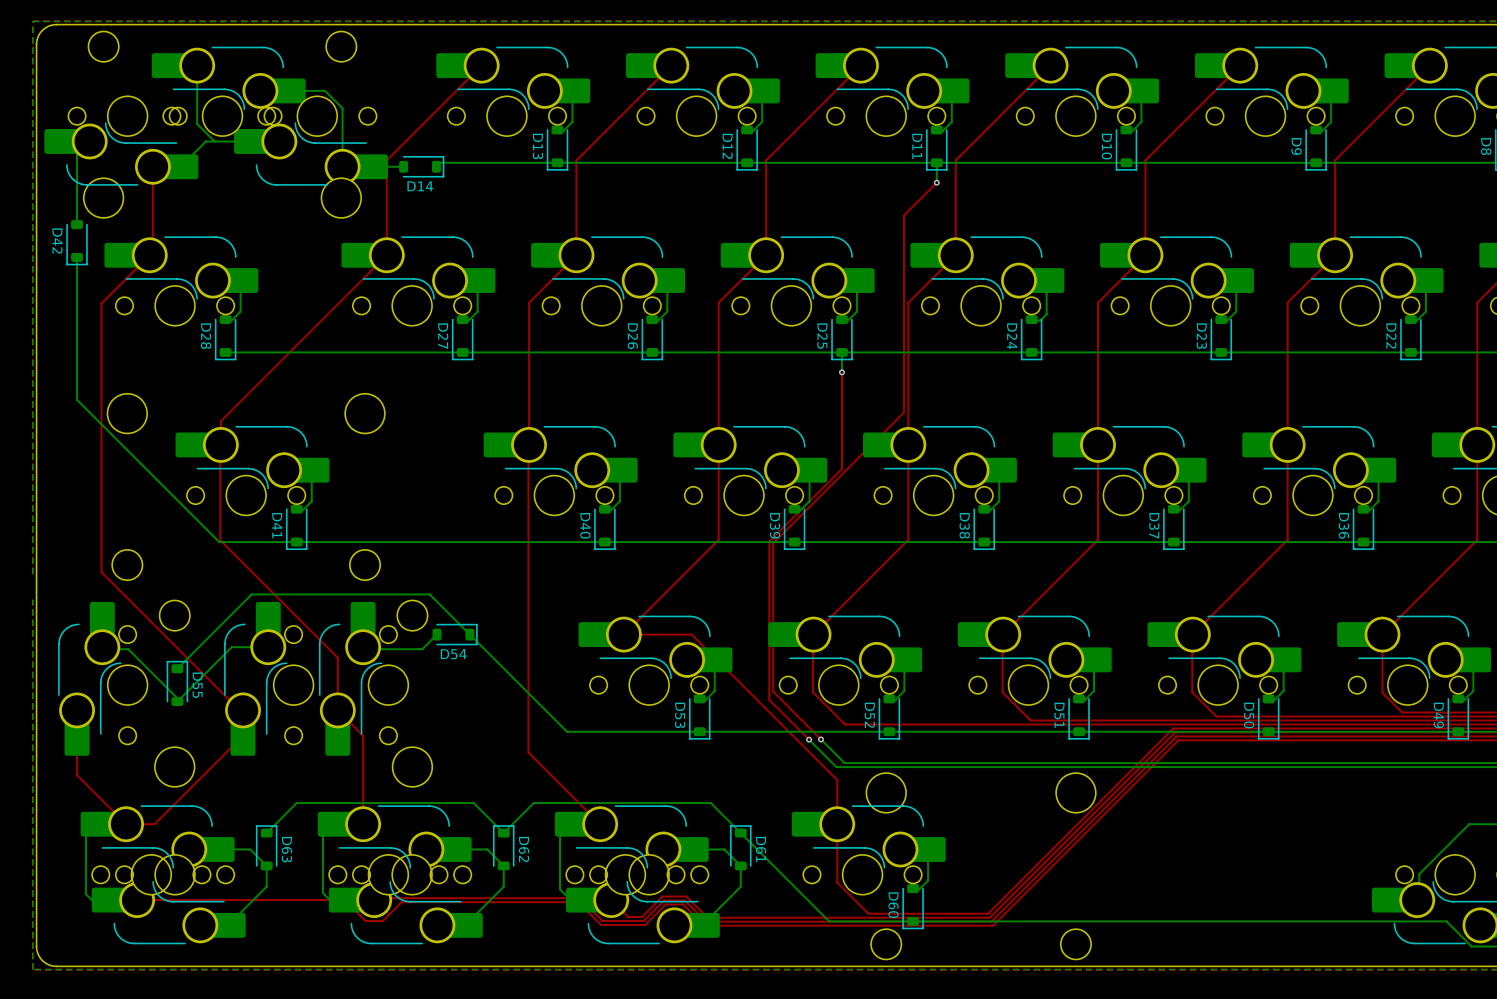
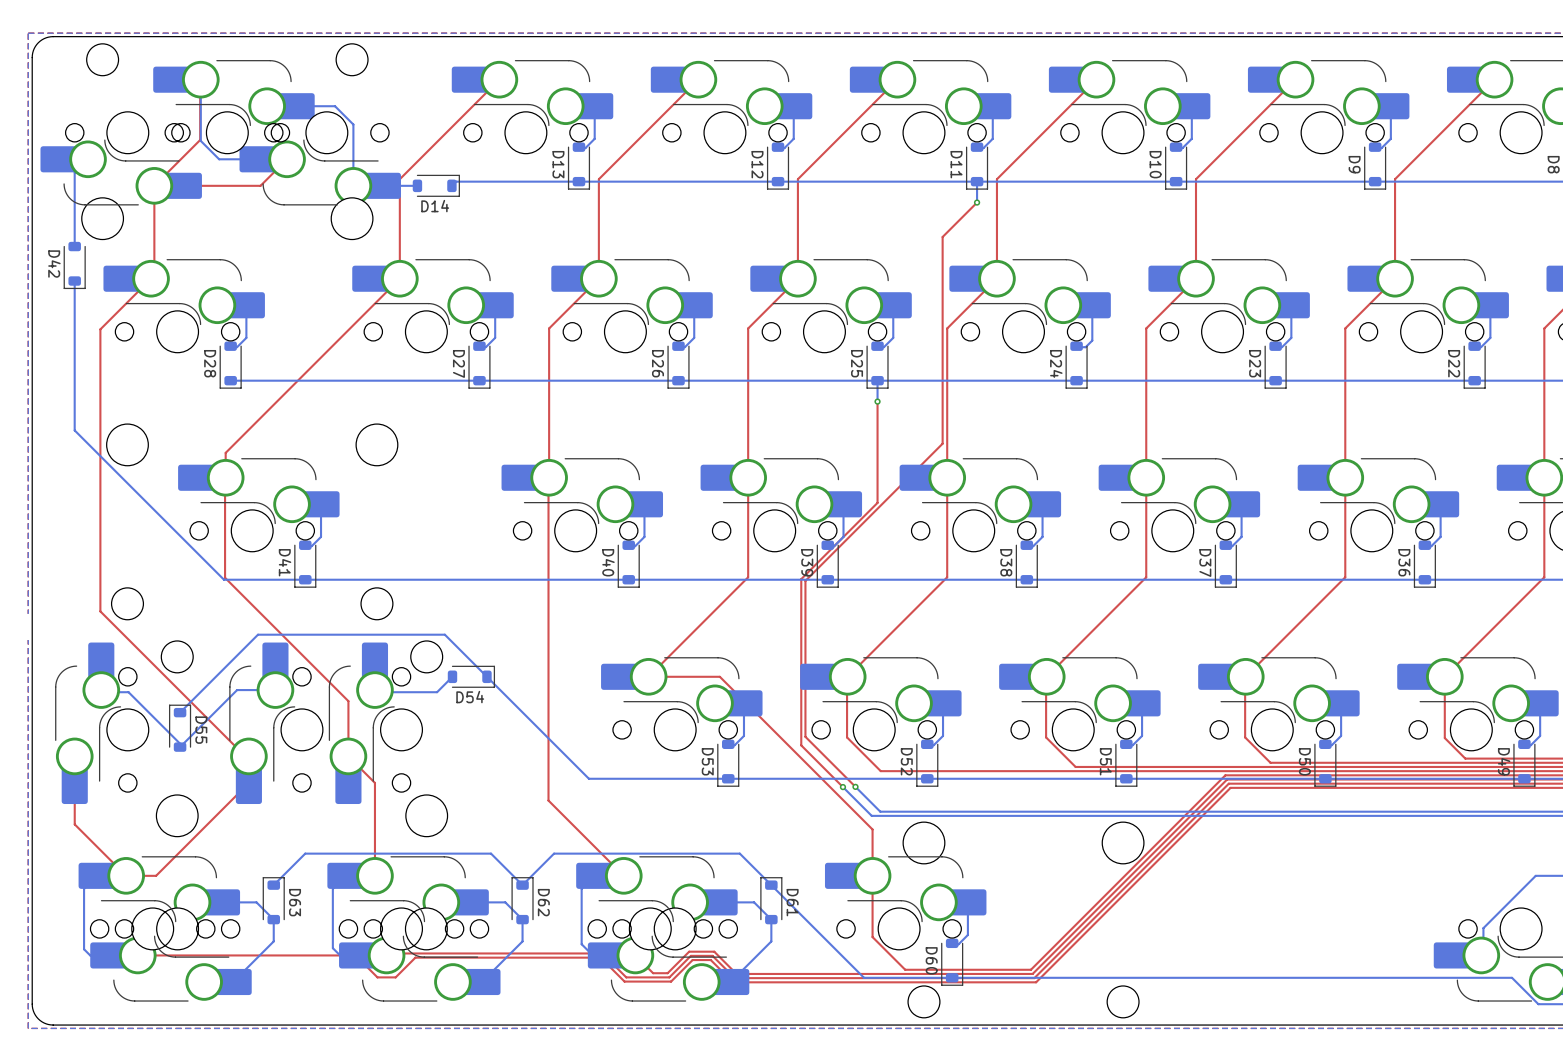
top track: none -> (200, 80) (200, 140) (154, 185) (260, 185) (287, 159)
bottom track: (214, 141) (205, 141) (180, 166) -> none

